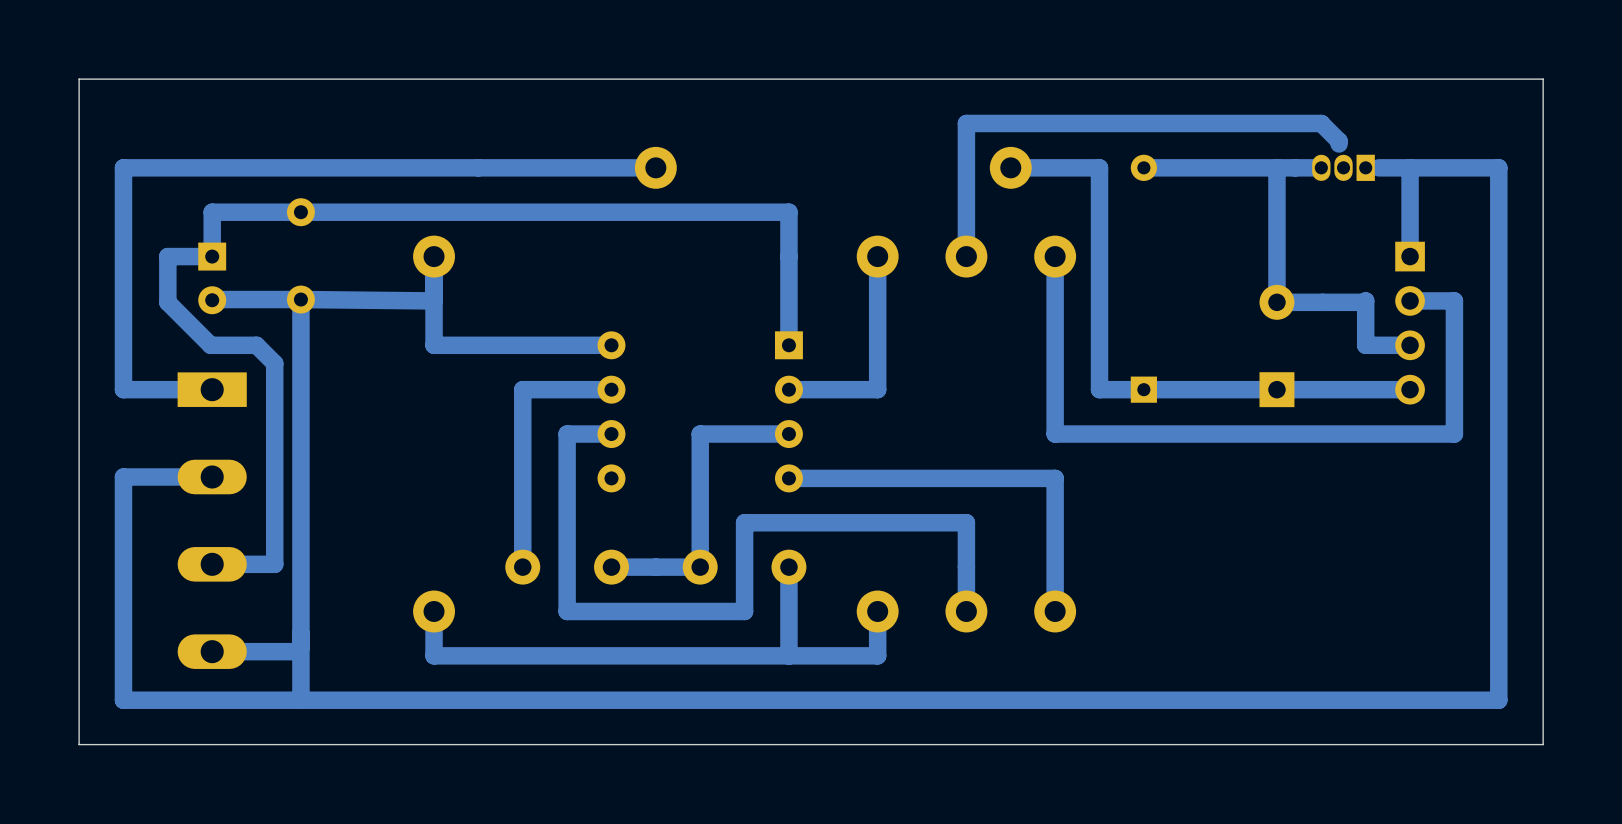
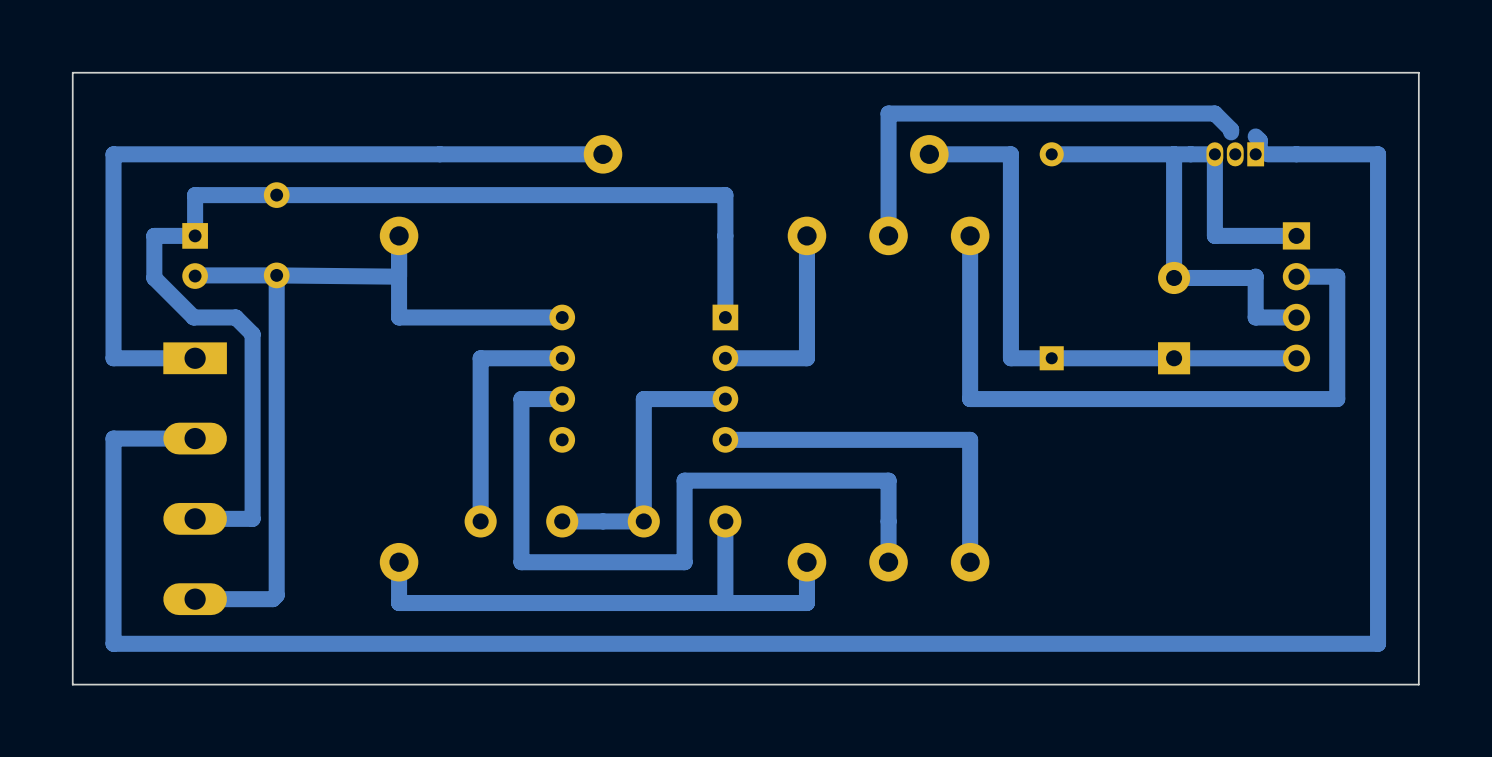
bottom track: none -> (1255, 136) (1259, 140) (1259, 154)
bottom track: (1410, 167) (1410, 256) -> (1214, 154) (1214, 235) (1296, 235)
bottom track: (300, 647) (300, 700) -> none

